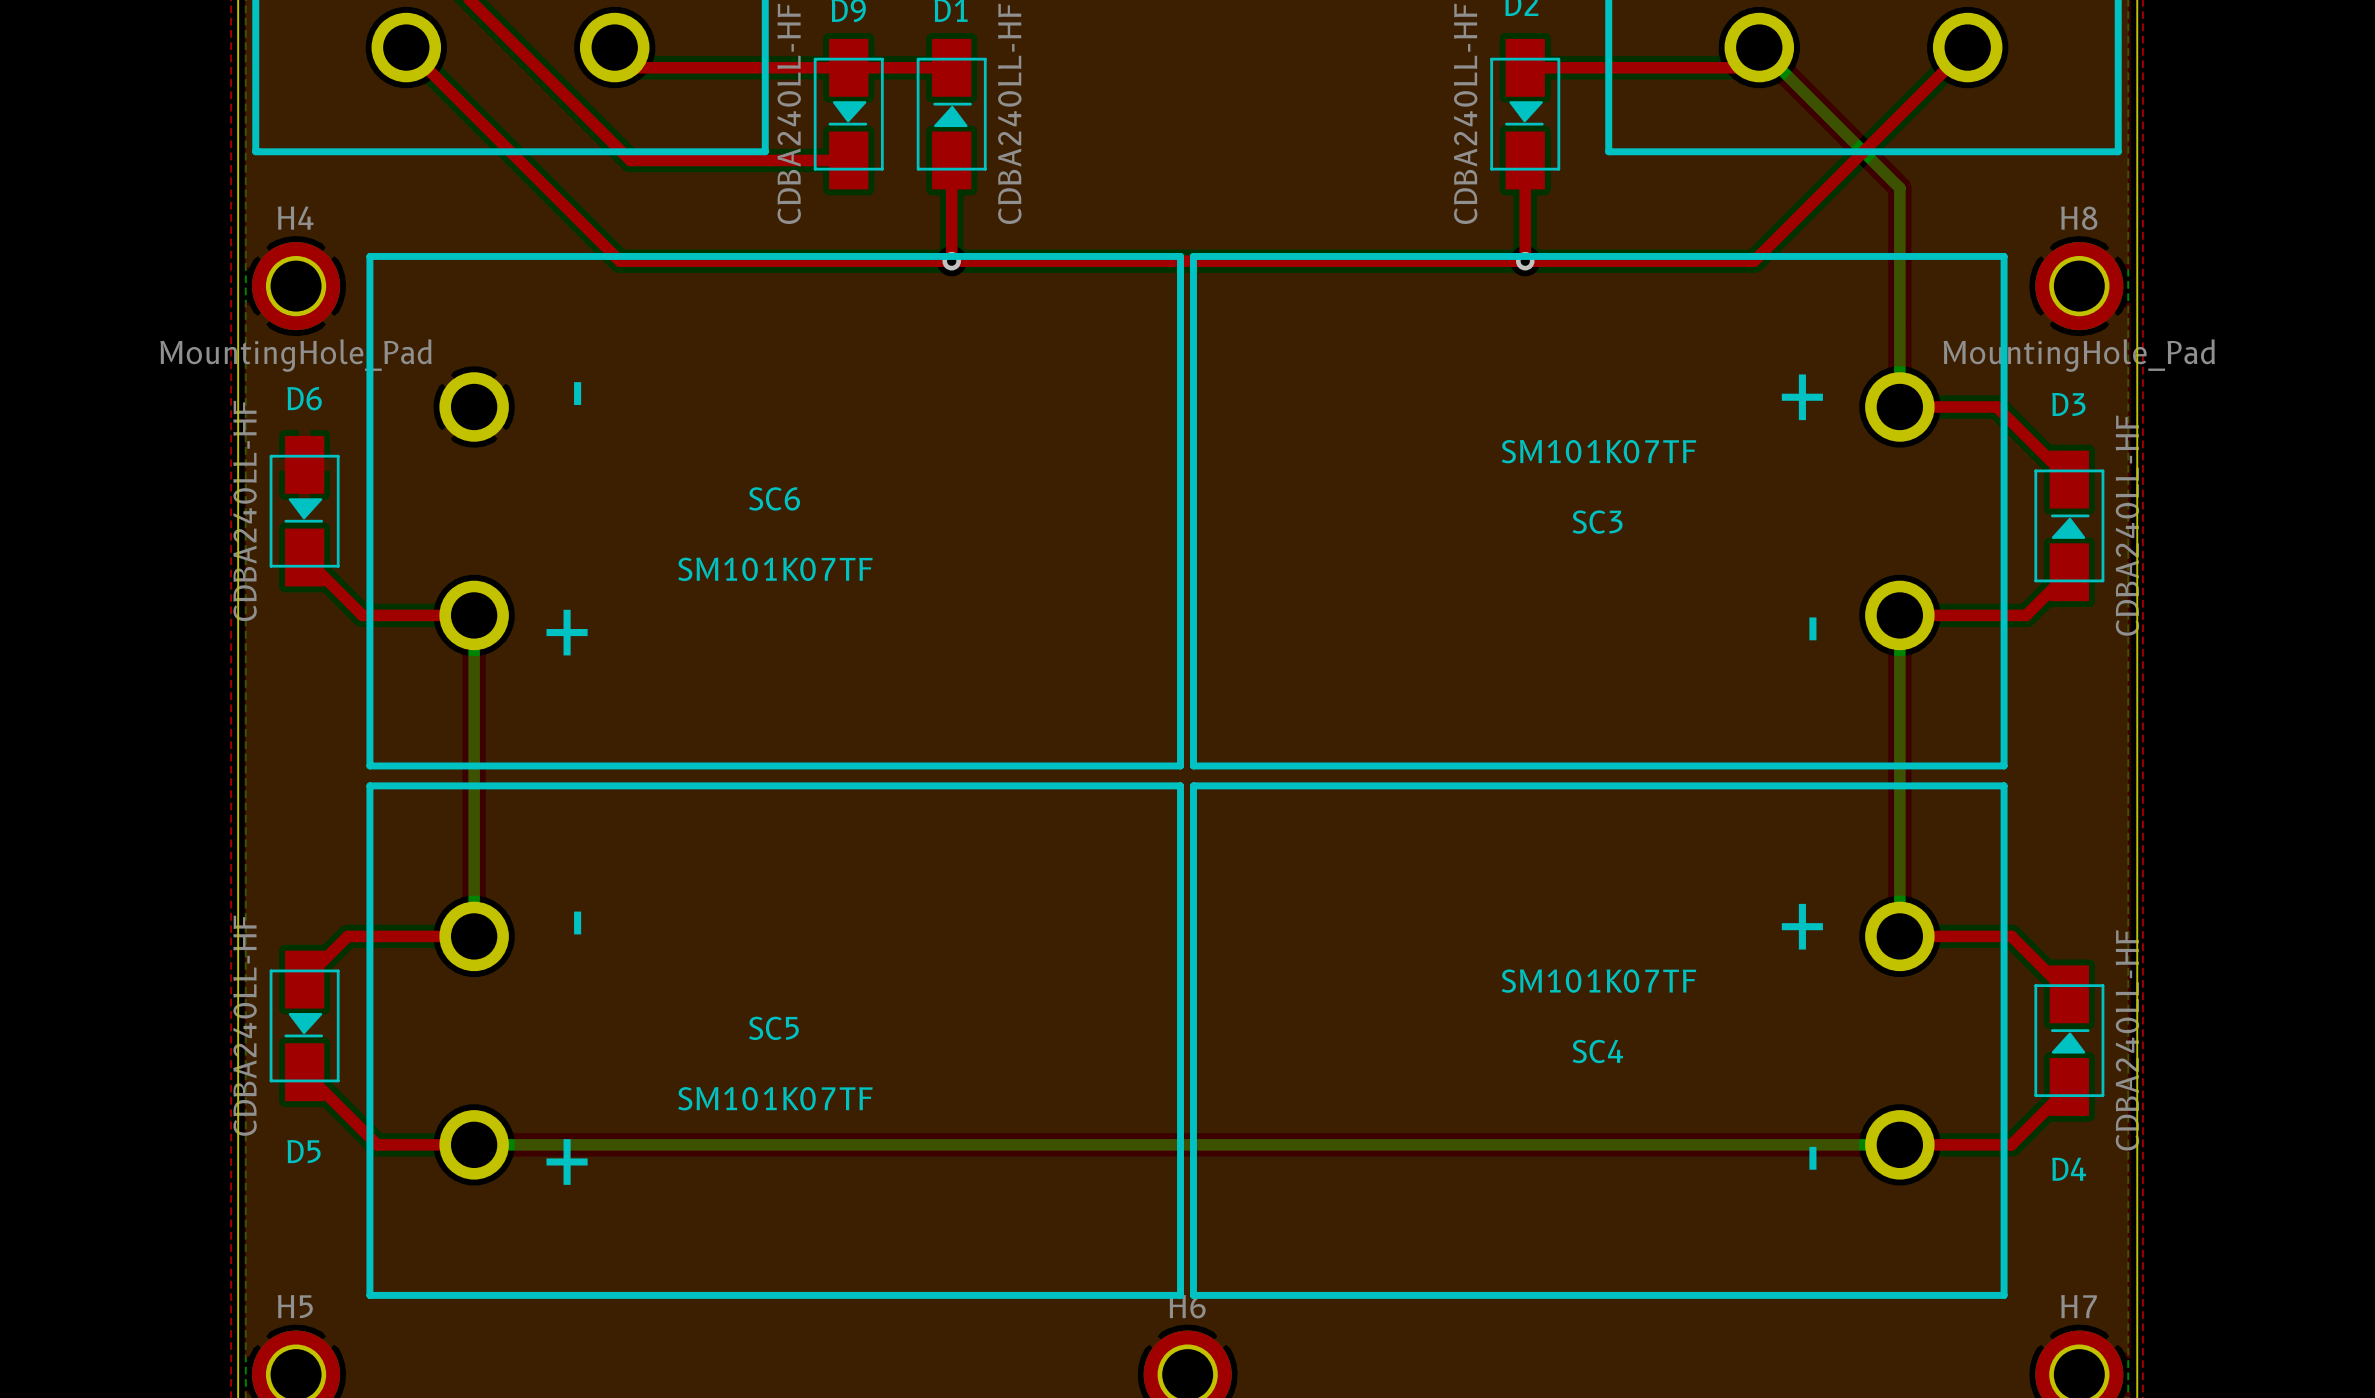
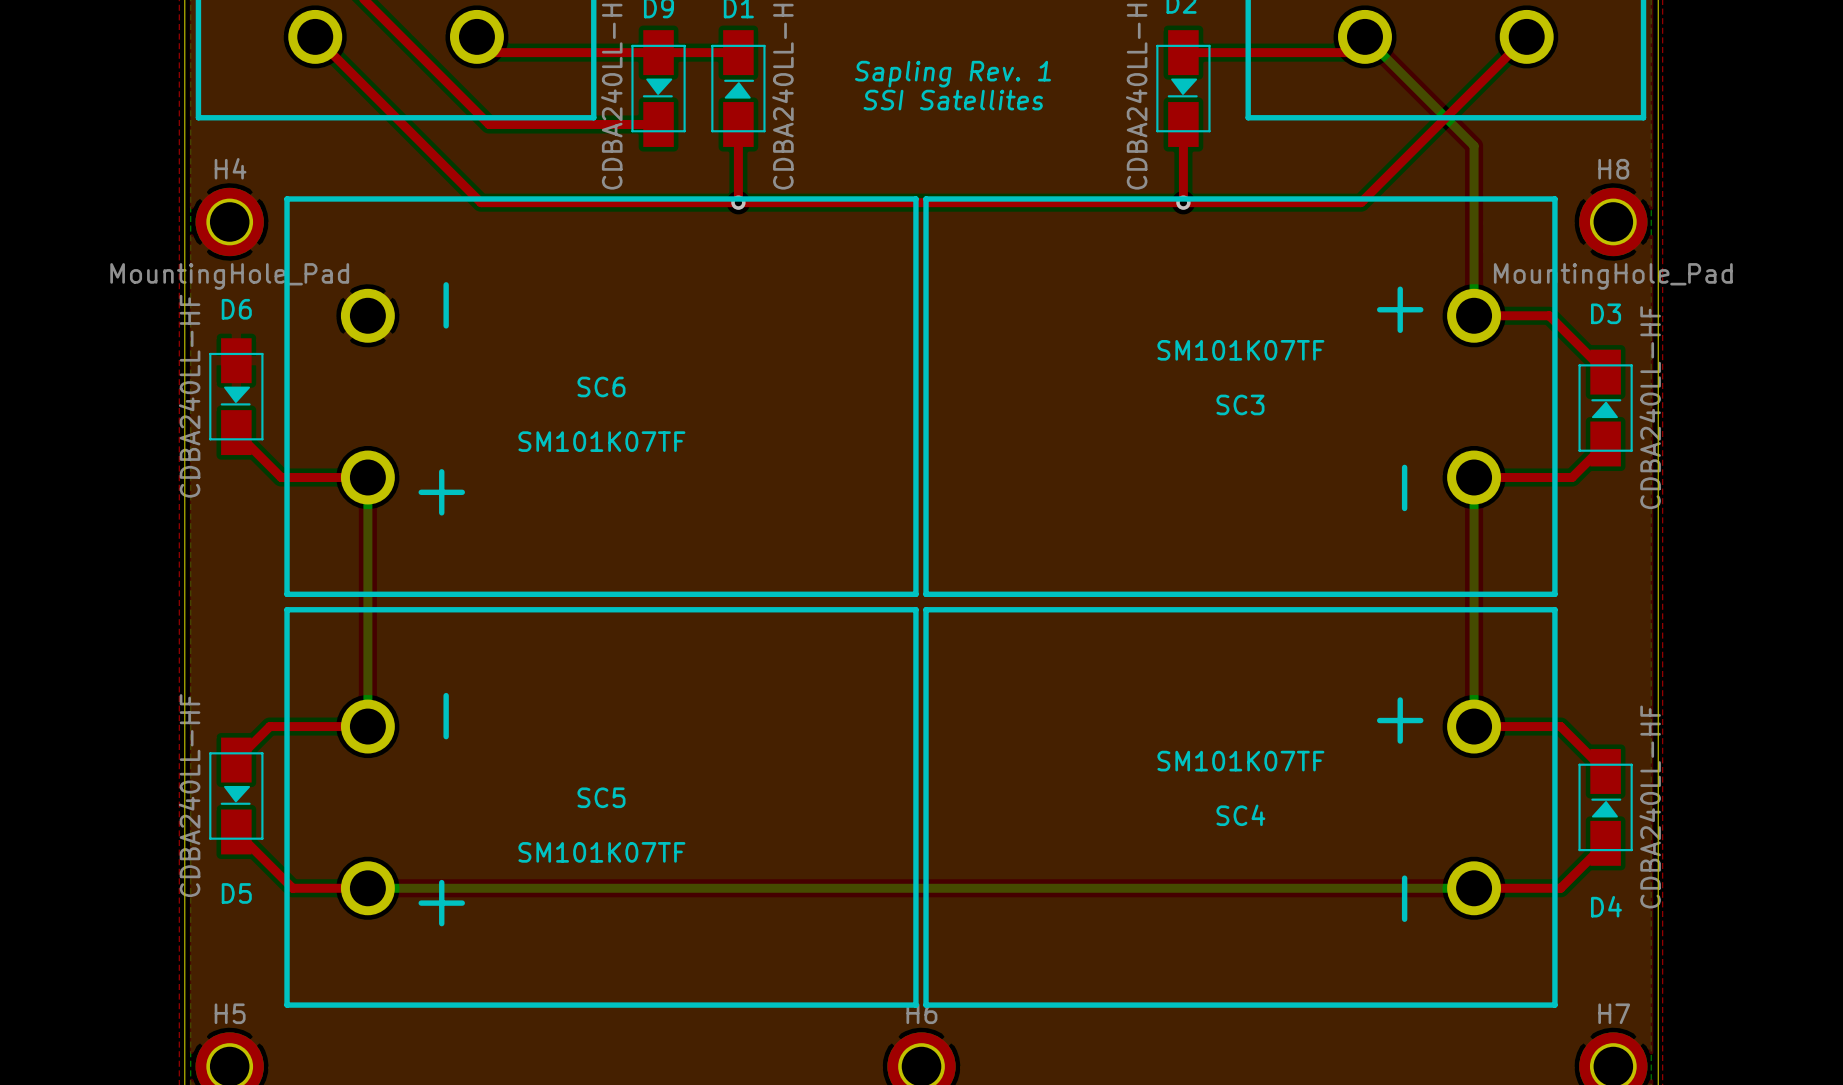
text: none -> Sapling Rev. 1 (952, 74)
text: none -> SSI Satellites (953, 100)

